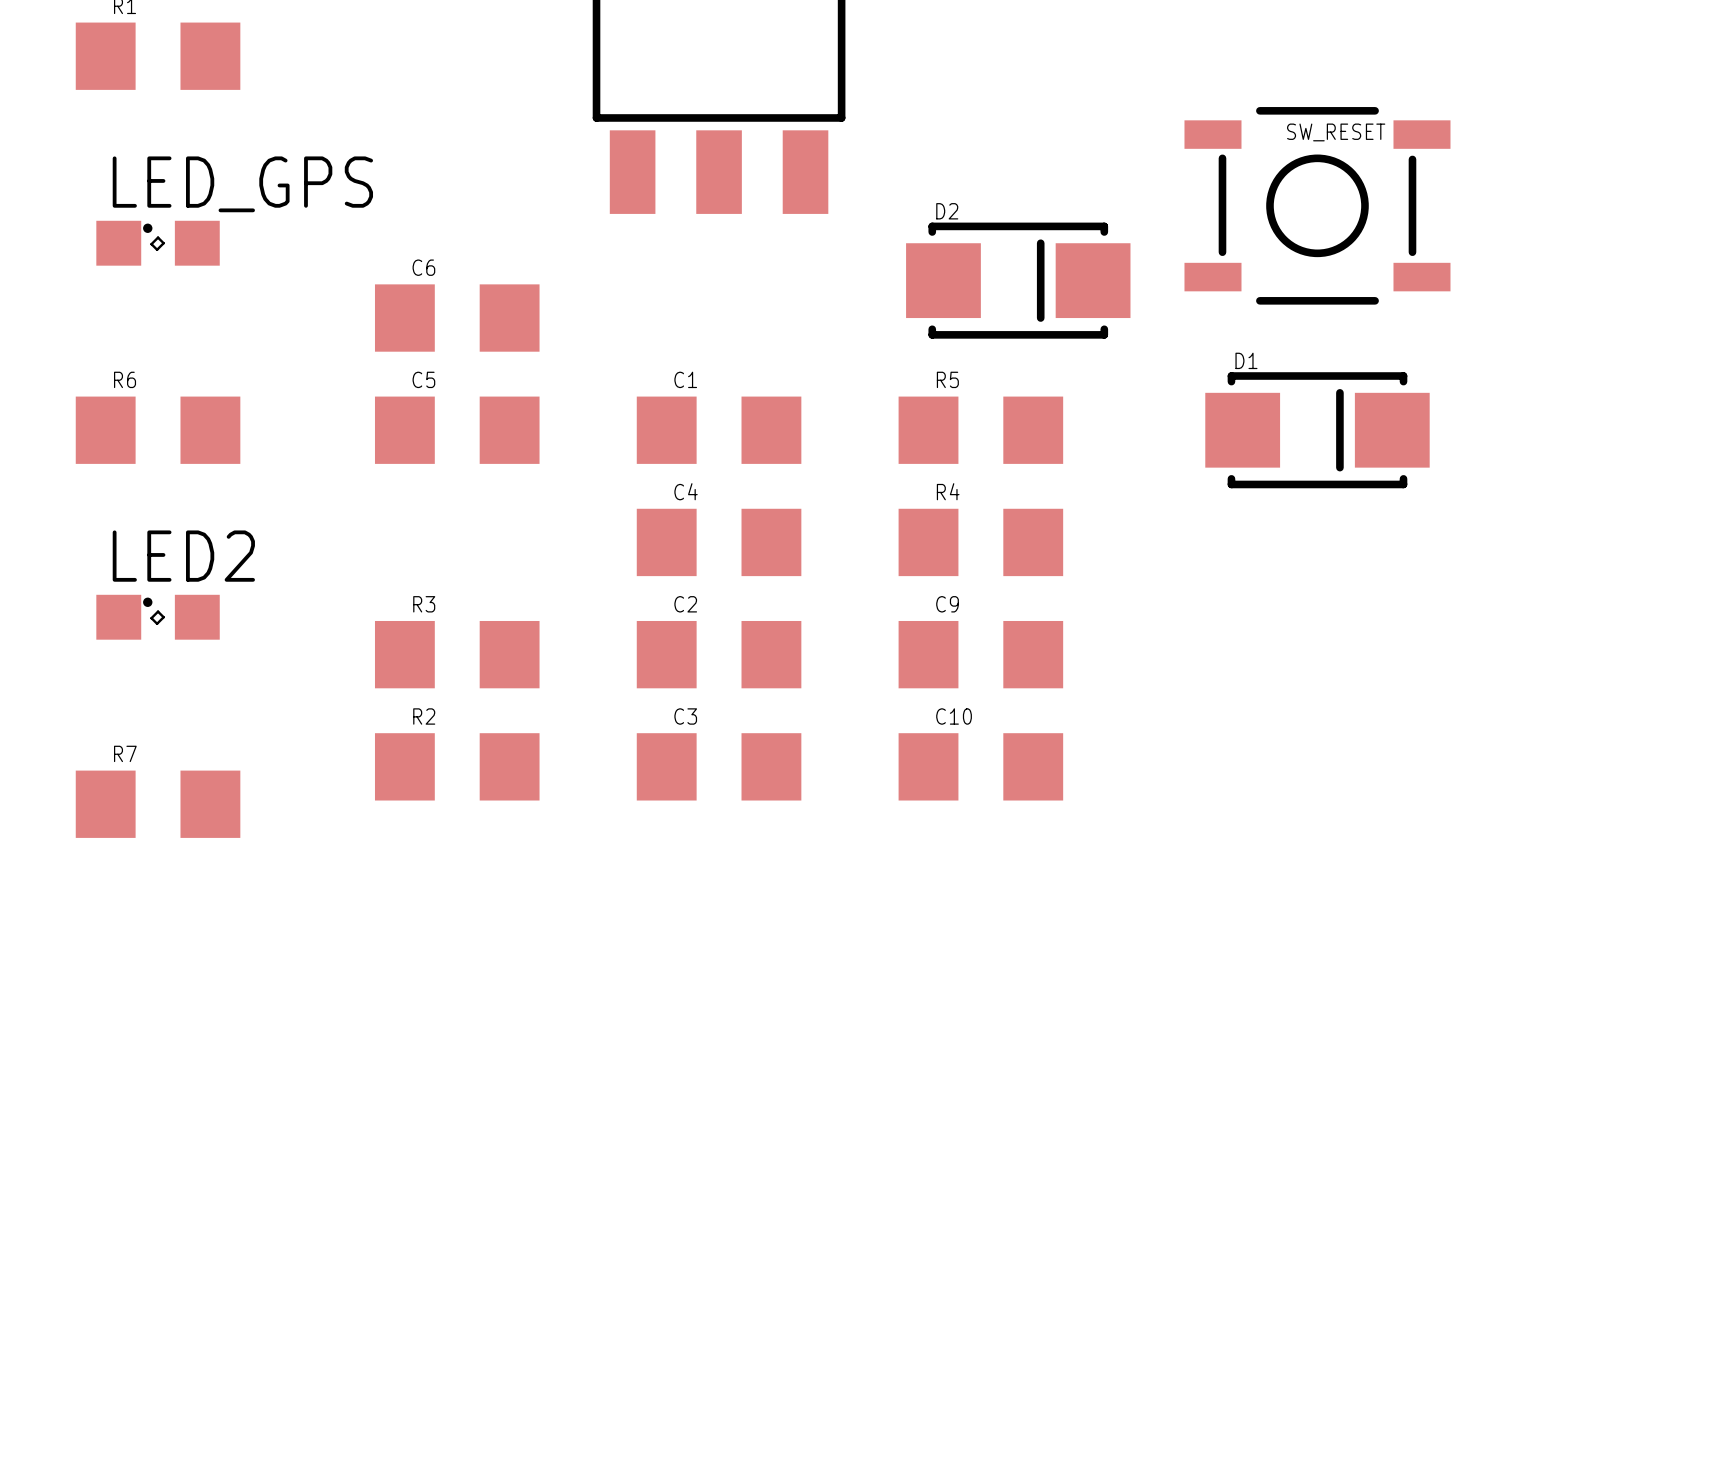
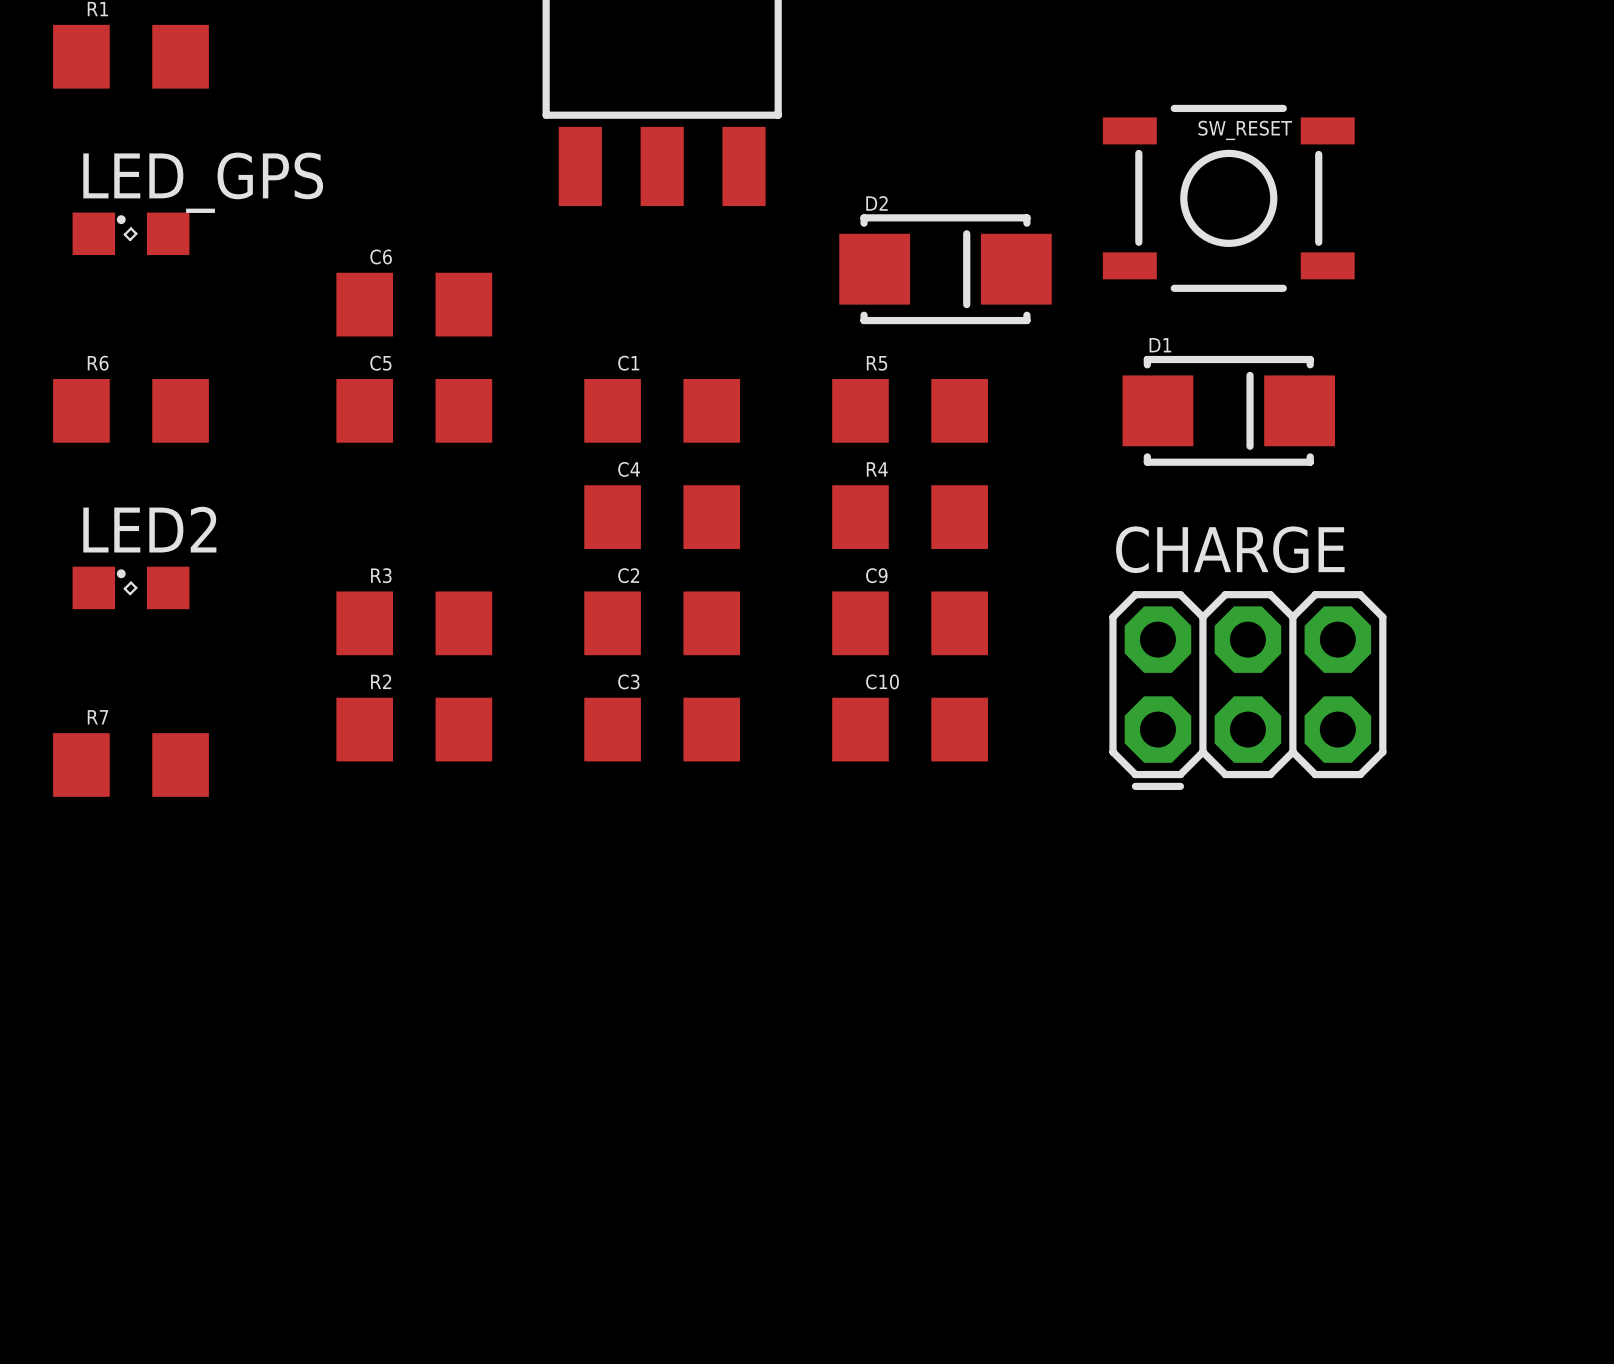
CHARGE: none -> (1247, 690)

